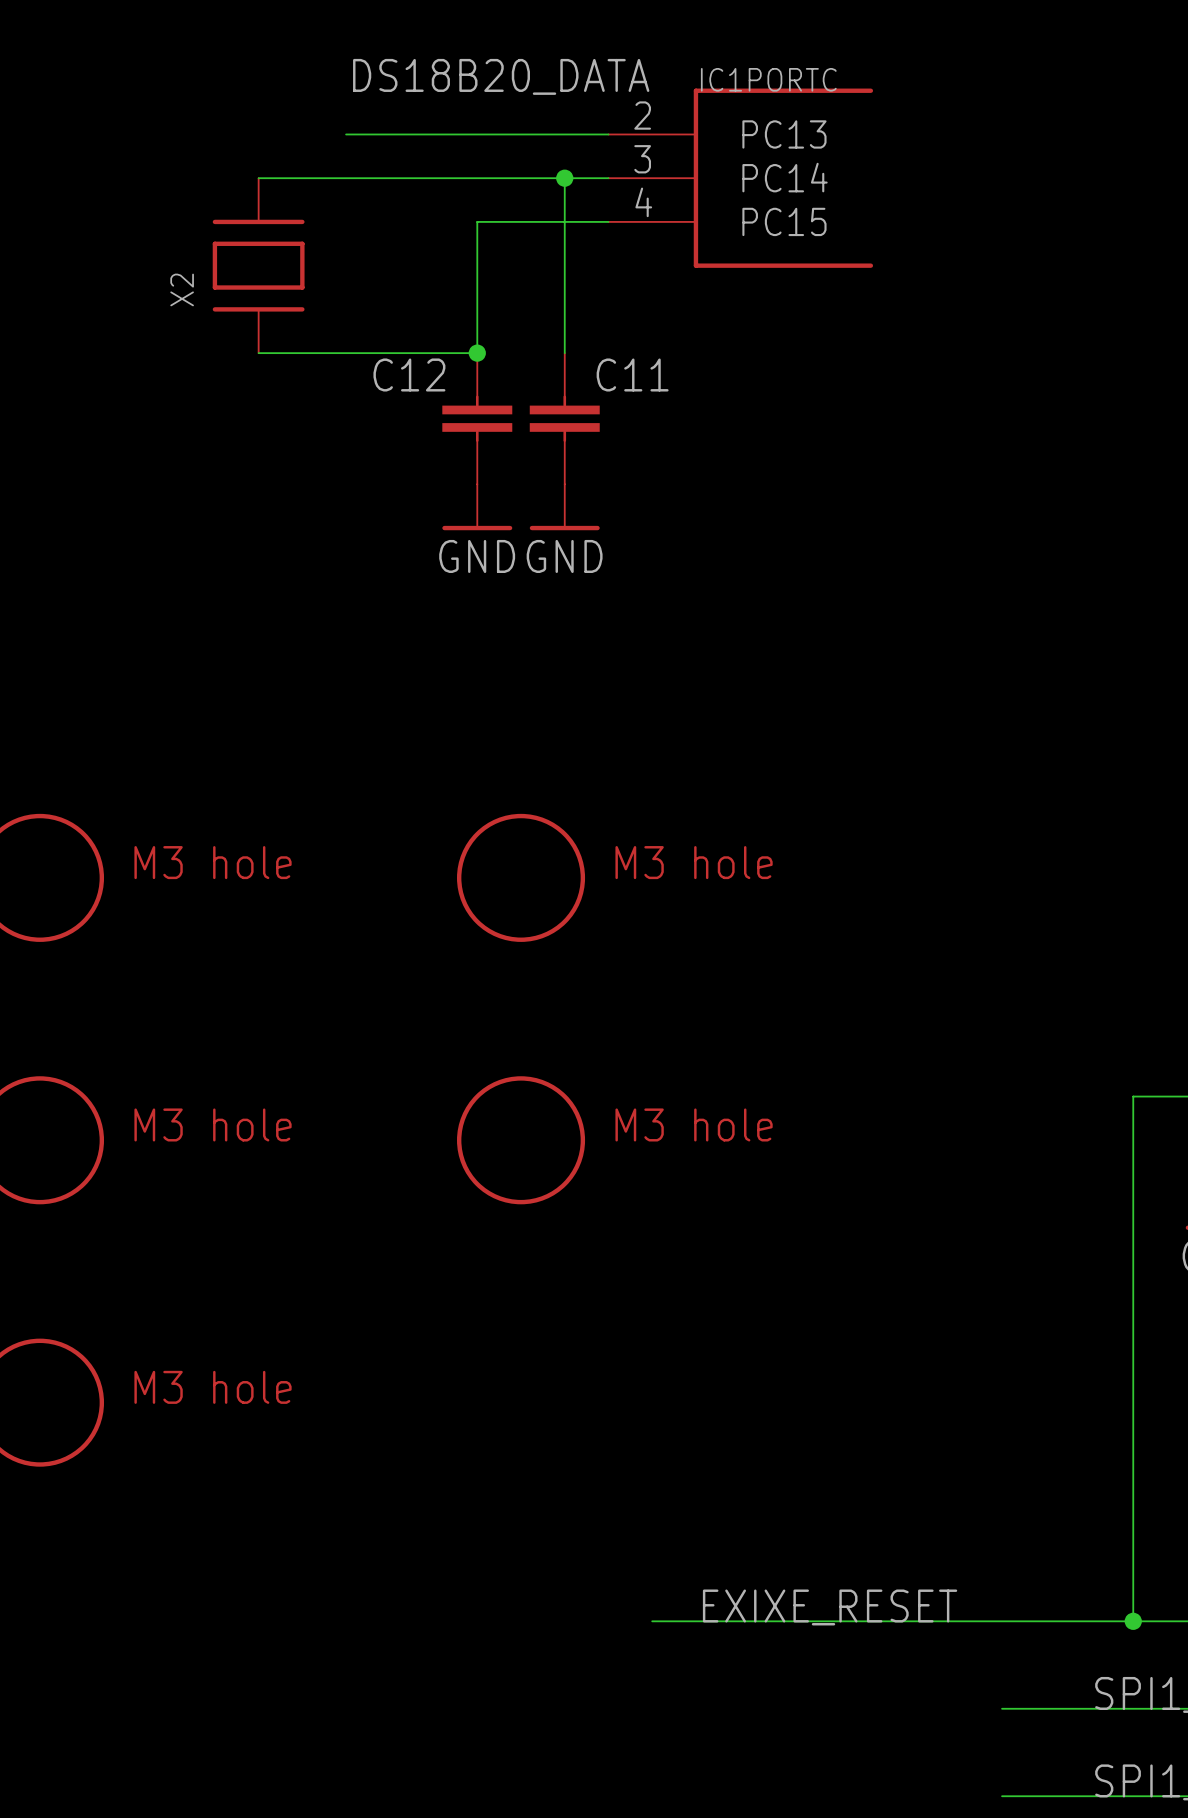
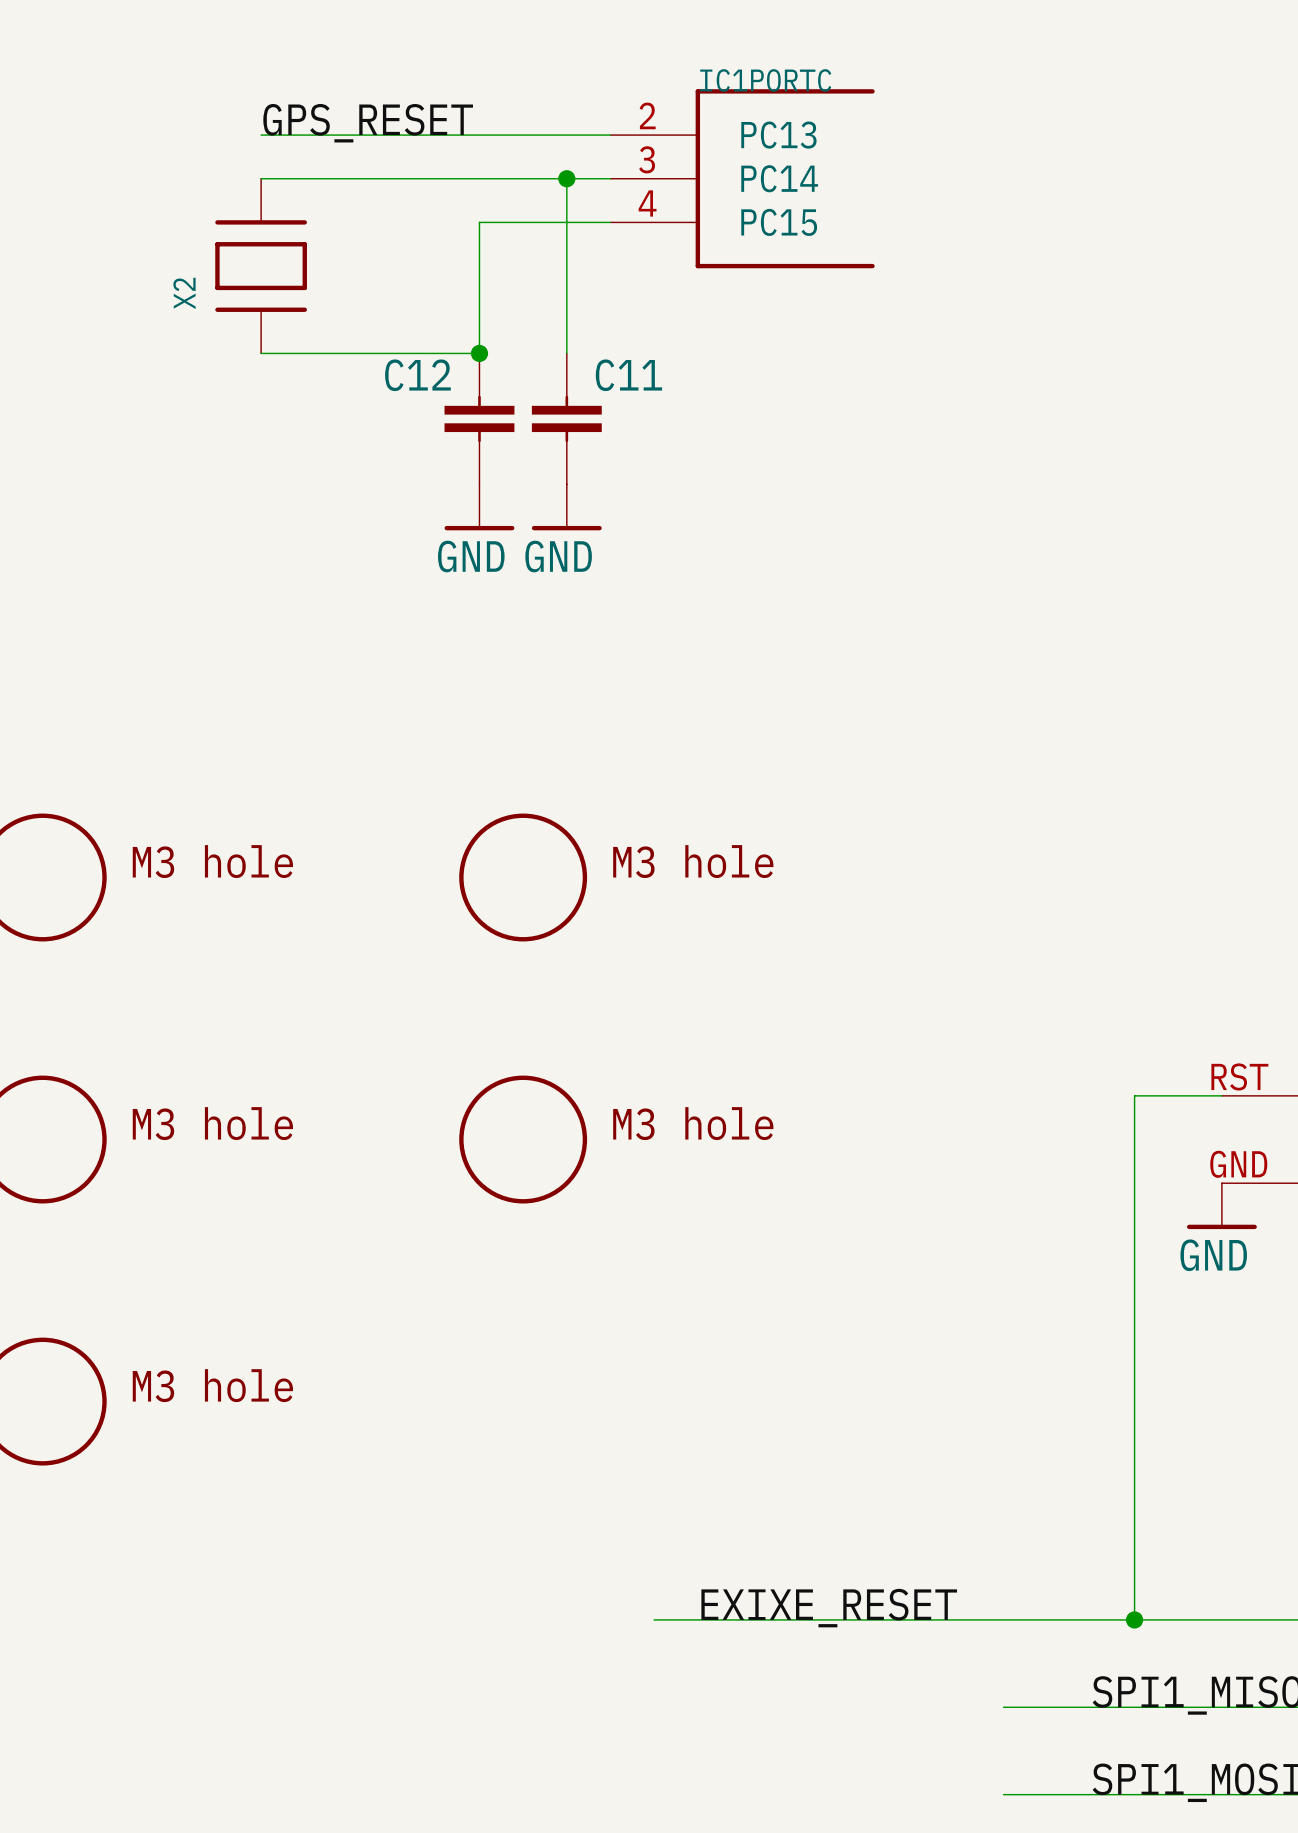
label: DS18B20_DATA (501, 76) -> none
label: none -> GPS_RESET (368, 123)
wire: none -> (261, 135) (348, 135)

